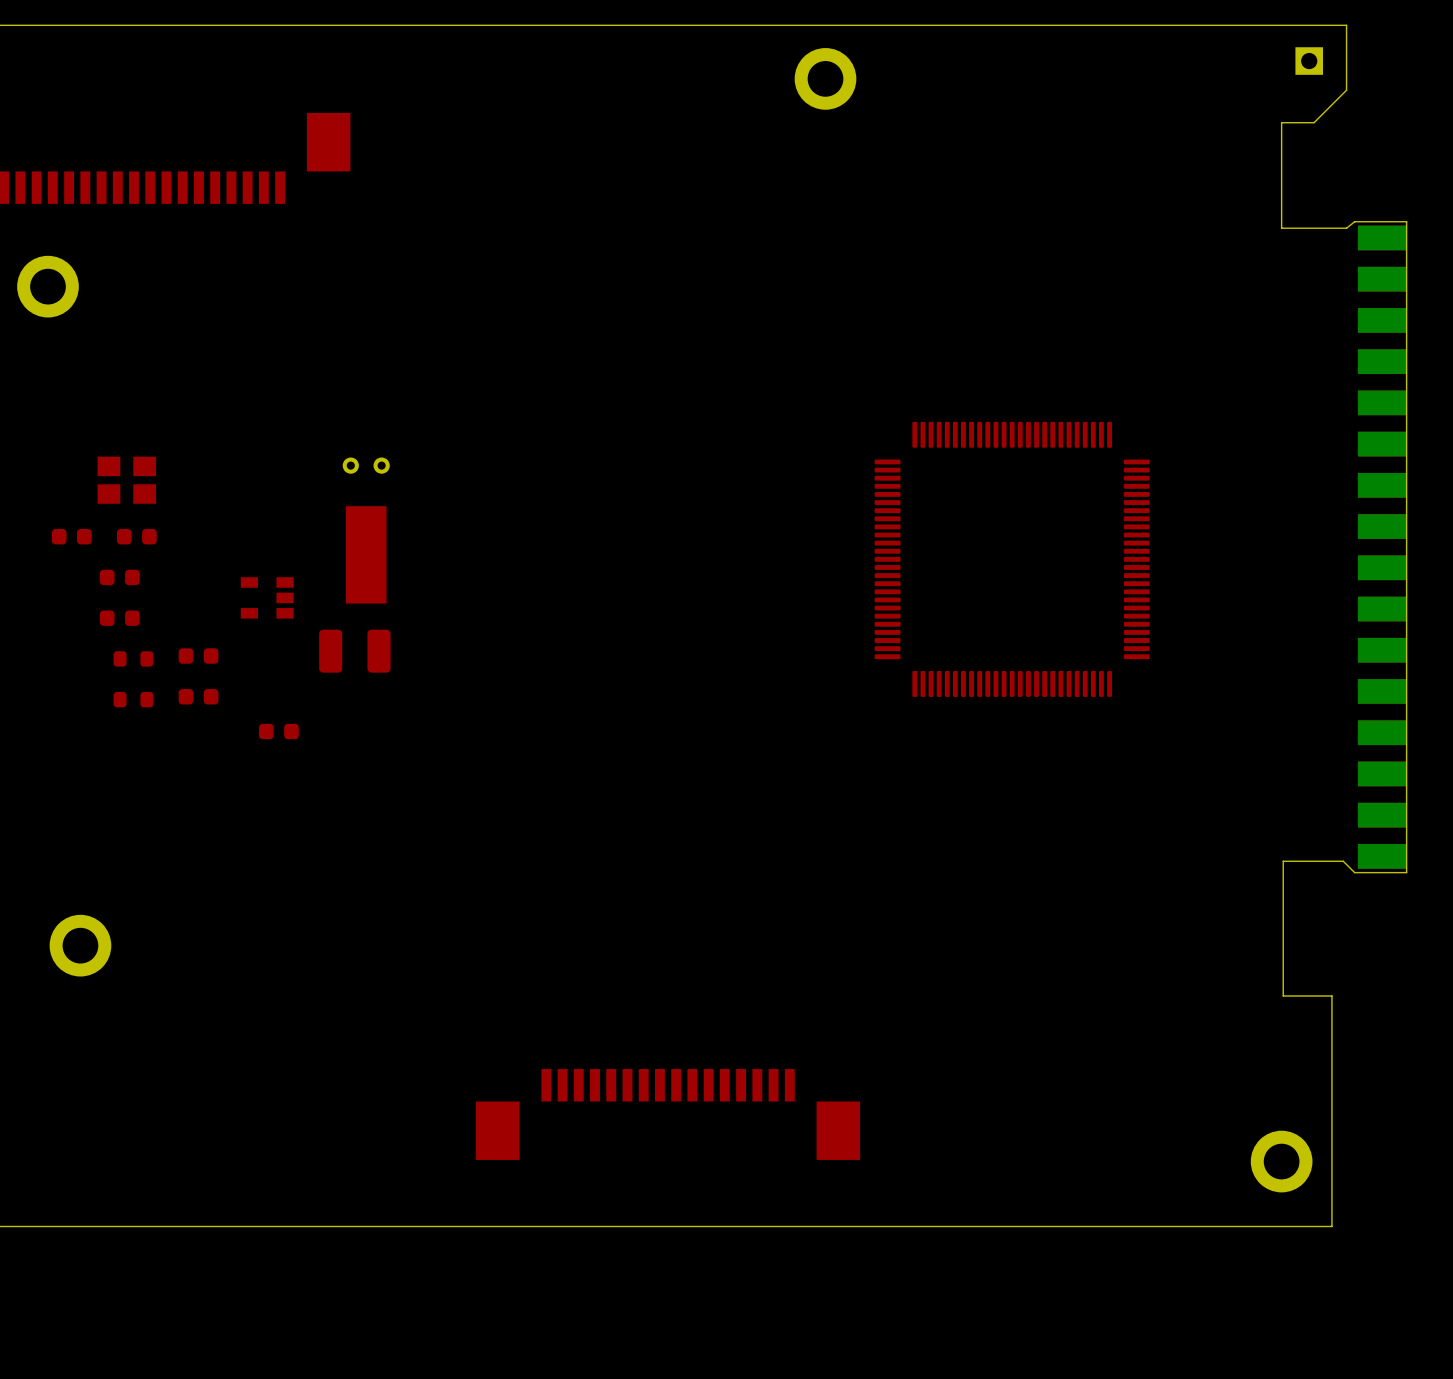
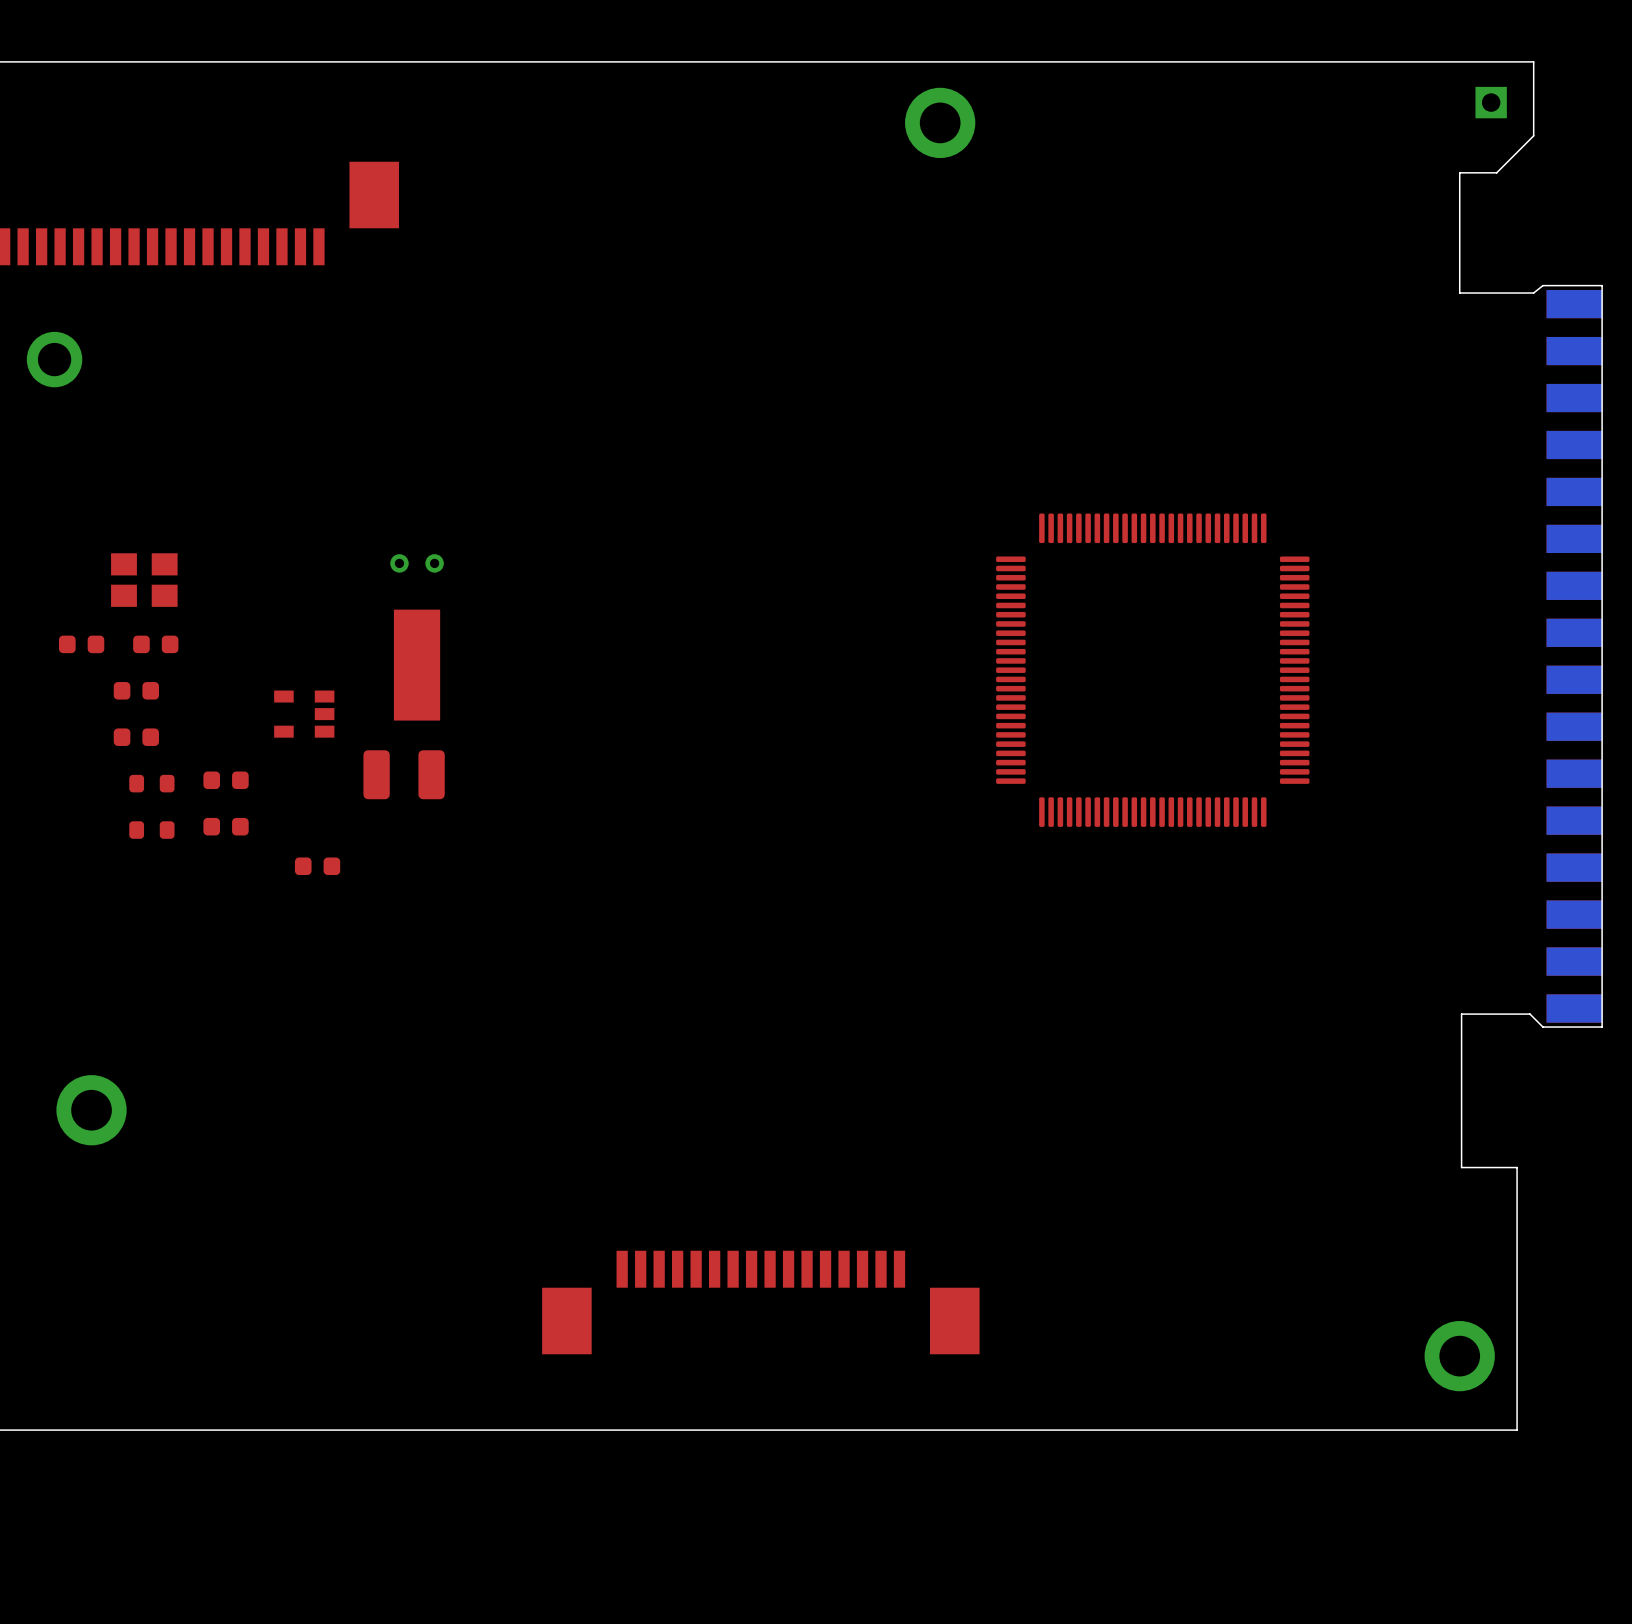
part footprint: [17, 255, 79, 318] -> [26, 331, 83, 388]

